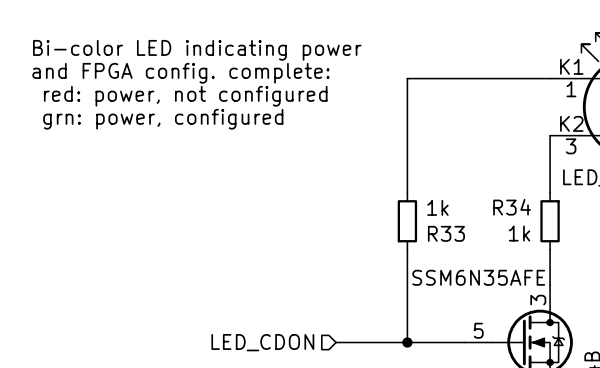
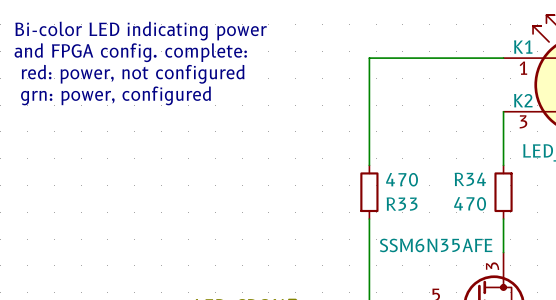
R33 value: 1k (437, 207) -> 470 (402, 179)
R34 value: 1k (519, 233) -> 470 (470, 203)

